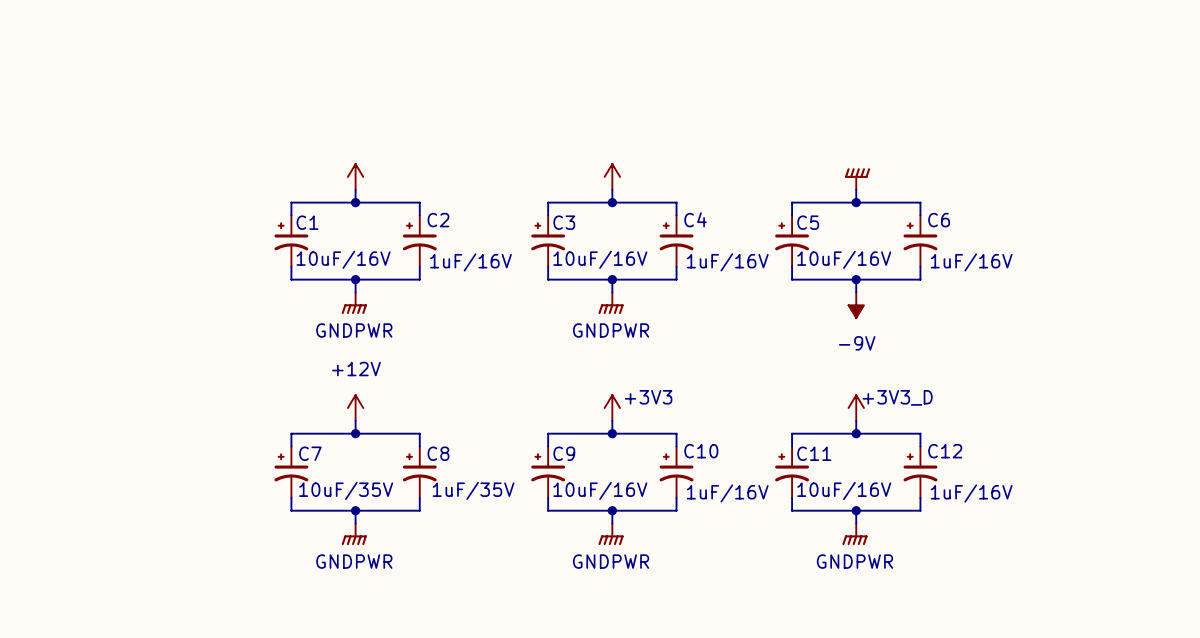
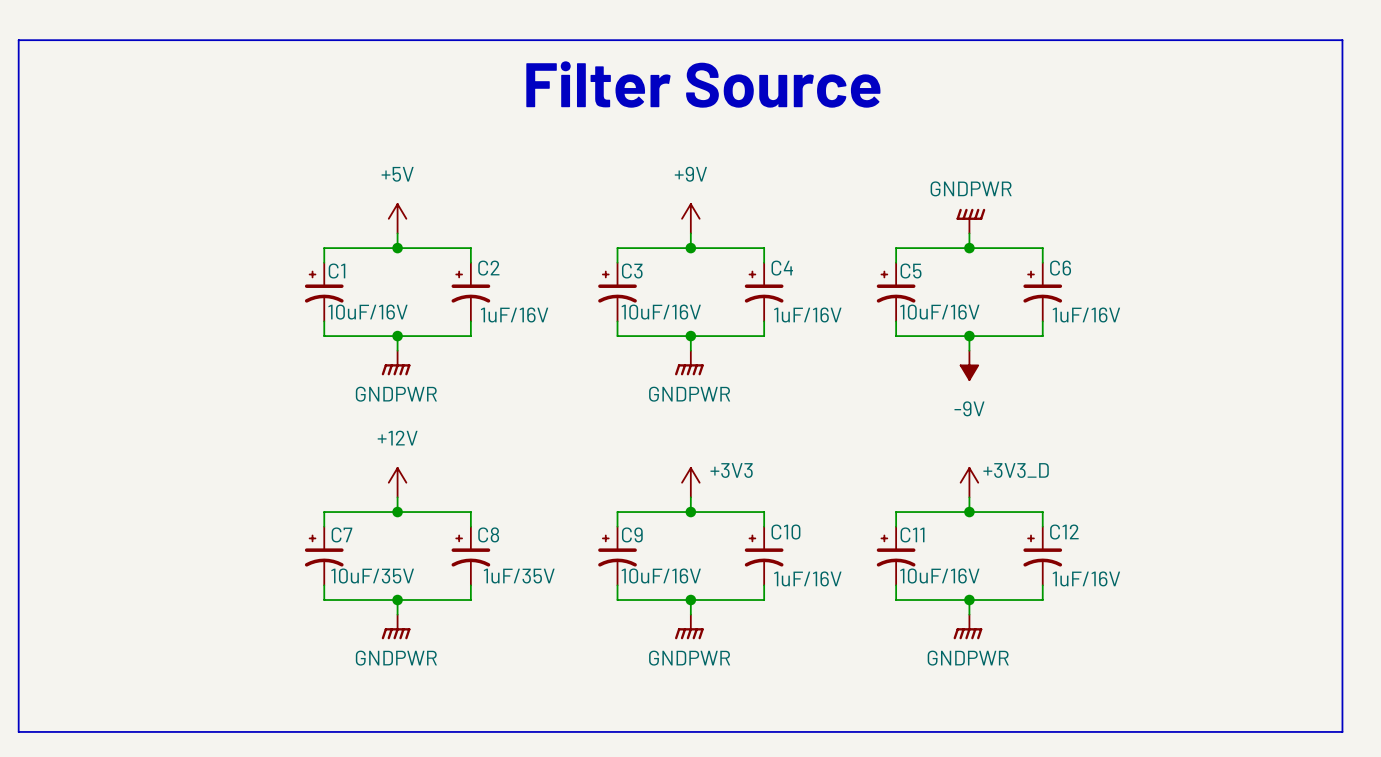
line: none -> (18, 40) (1342, 40) (1342, 731) (18, 731) (18, 40)
text: none -> Filter Source (703, 84)
power symbol text: none -> +5V (397, 174)
power symbol text: none -> +9V (690, 174)
power symbol text: none -> GNDPWR (971, 188)

